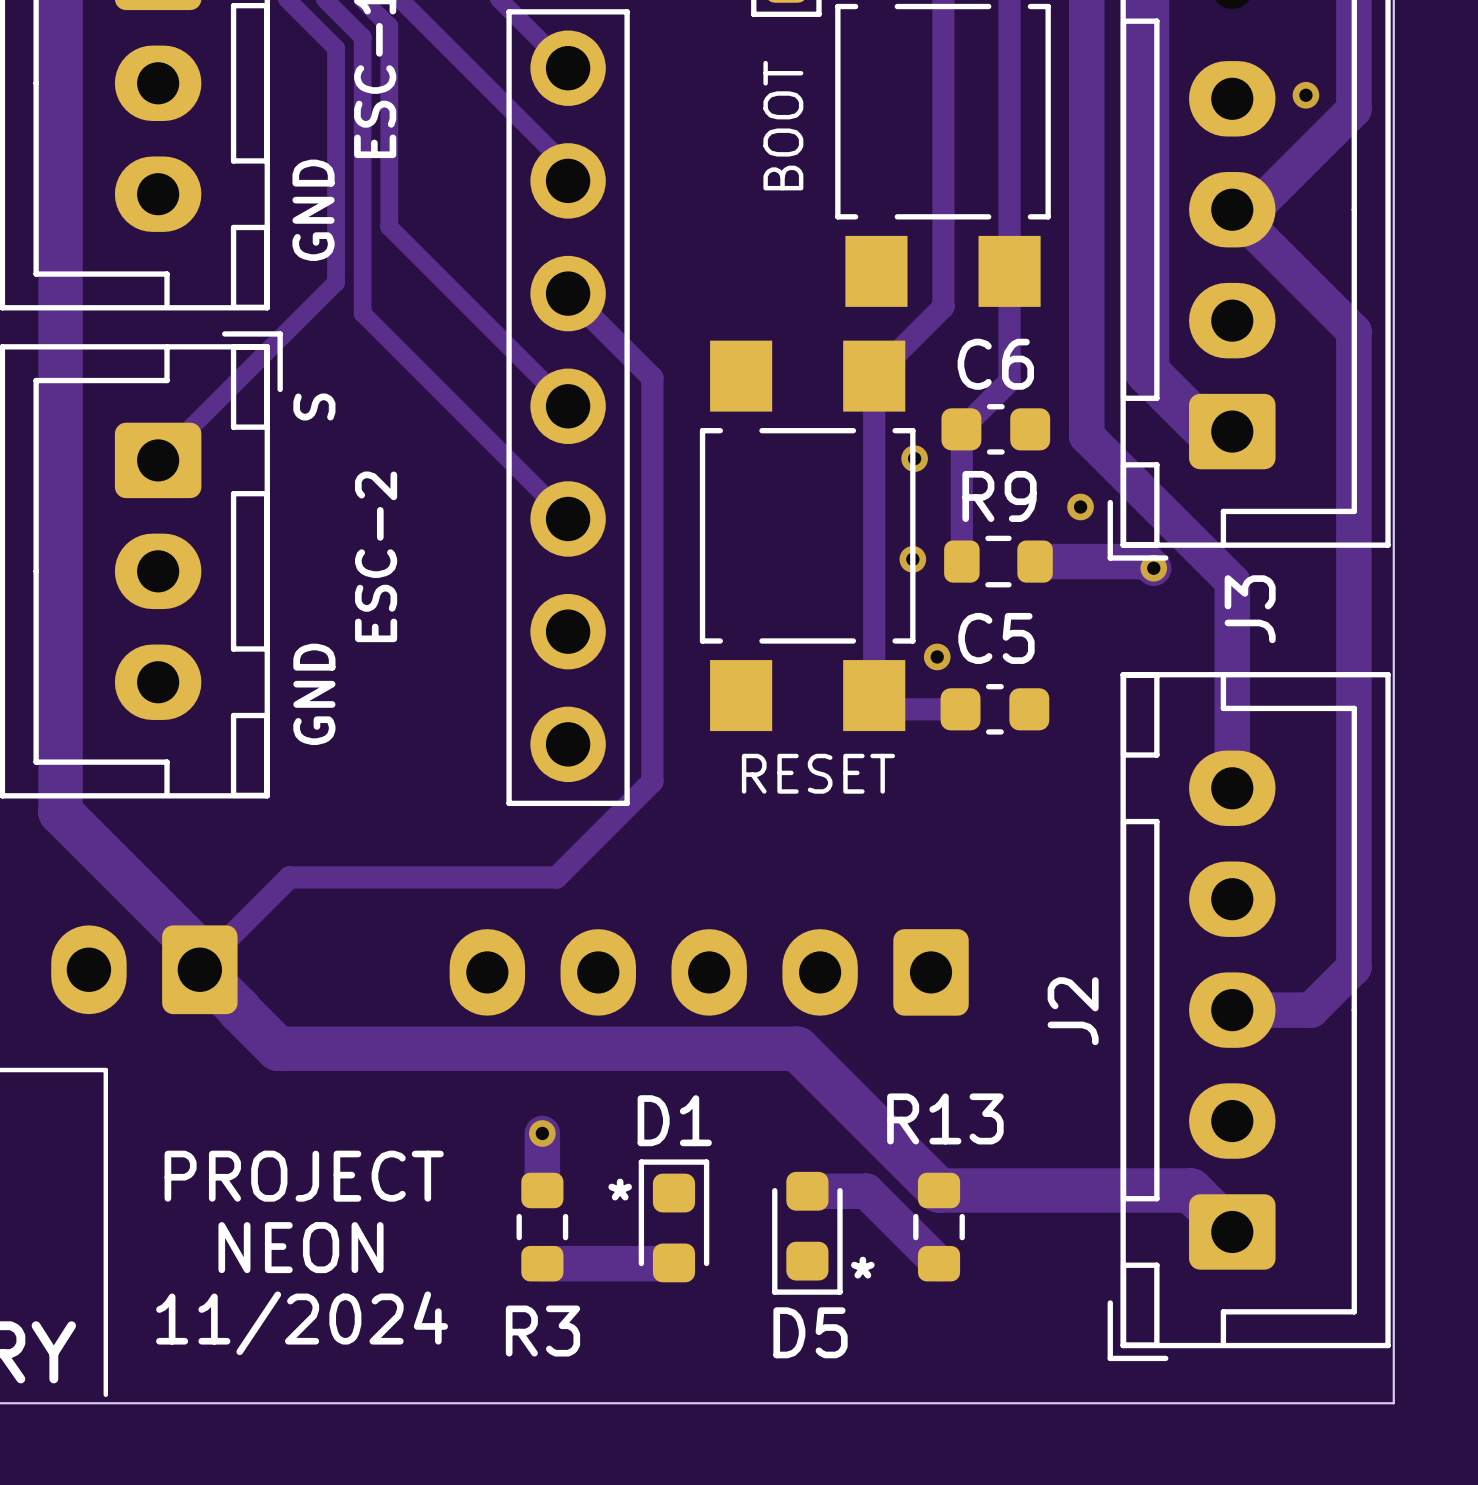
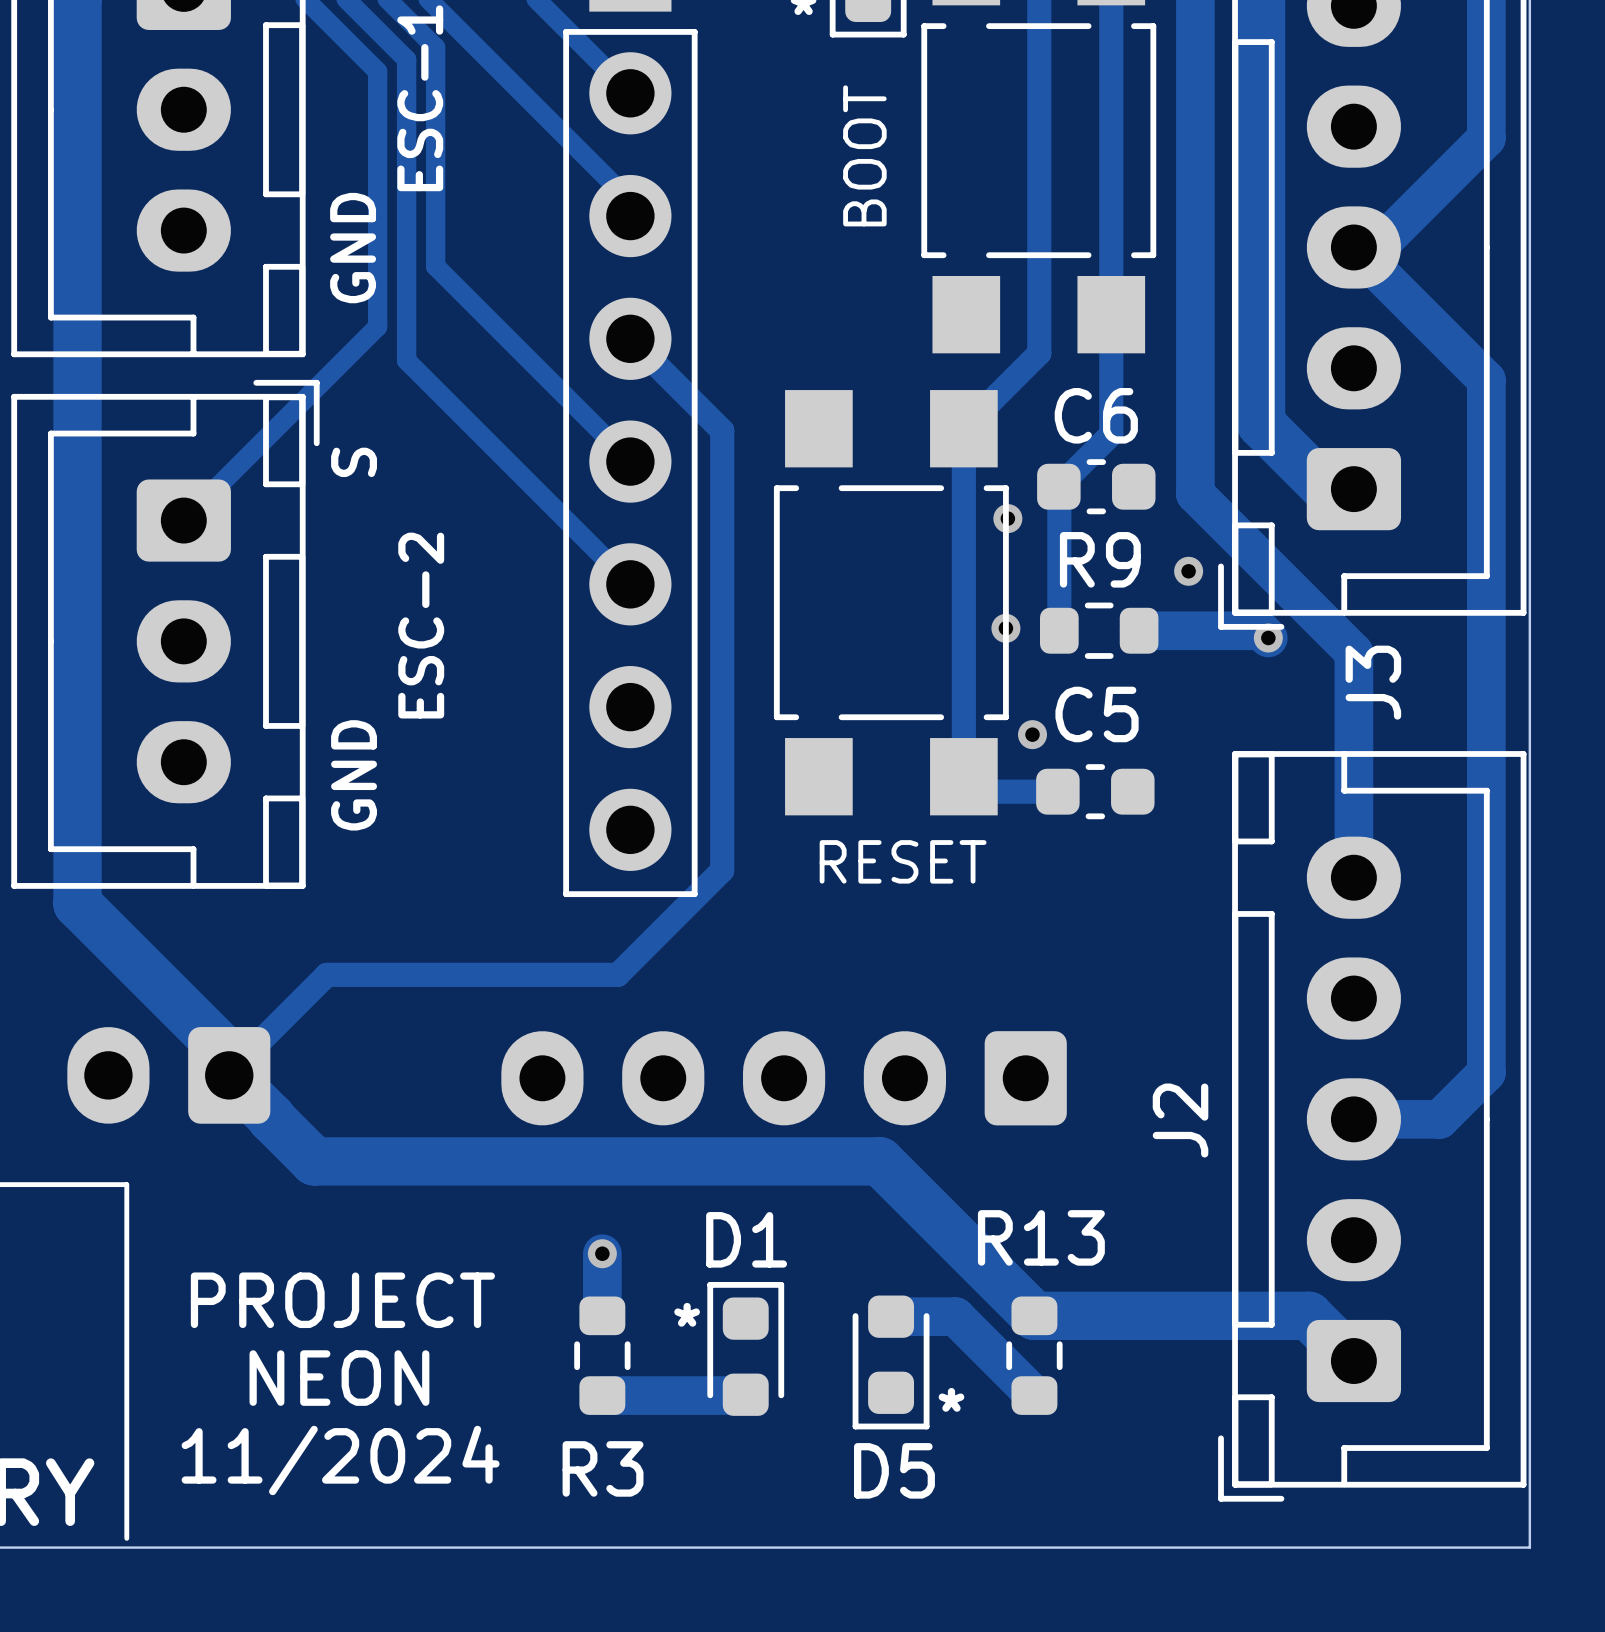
via: (1305, 95) -> none

